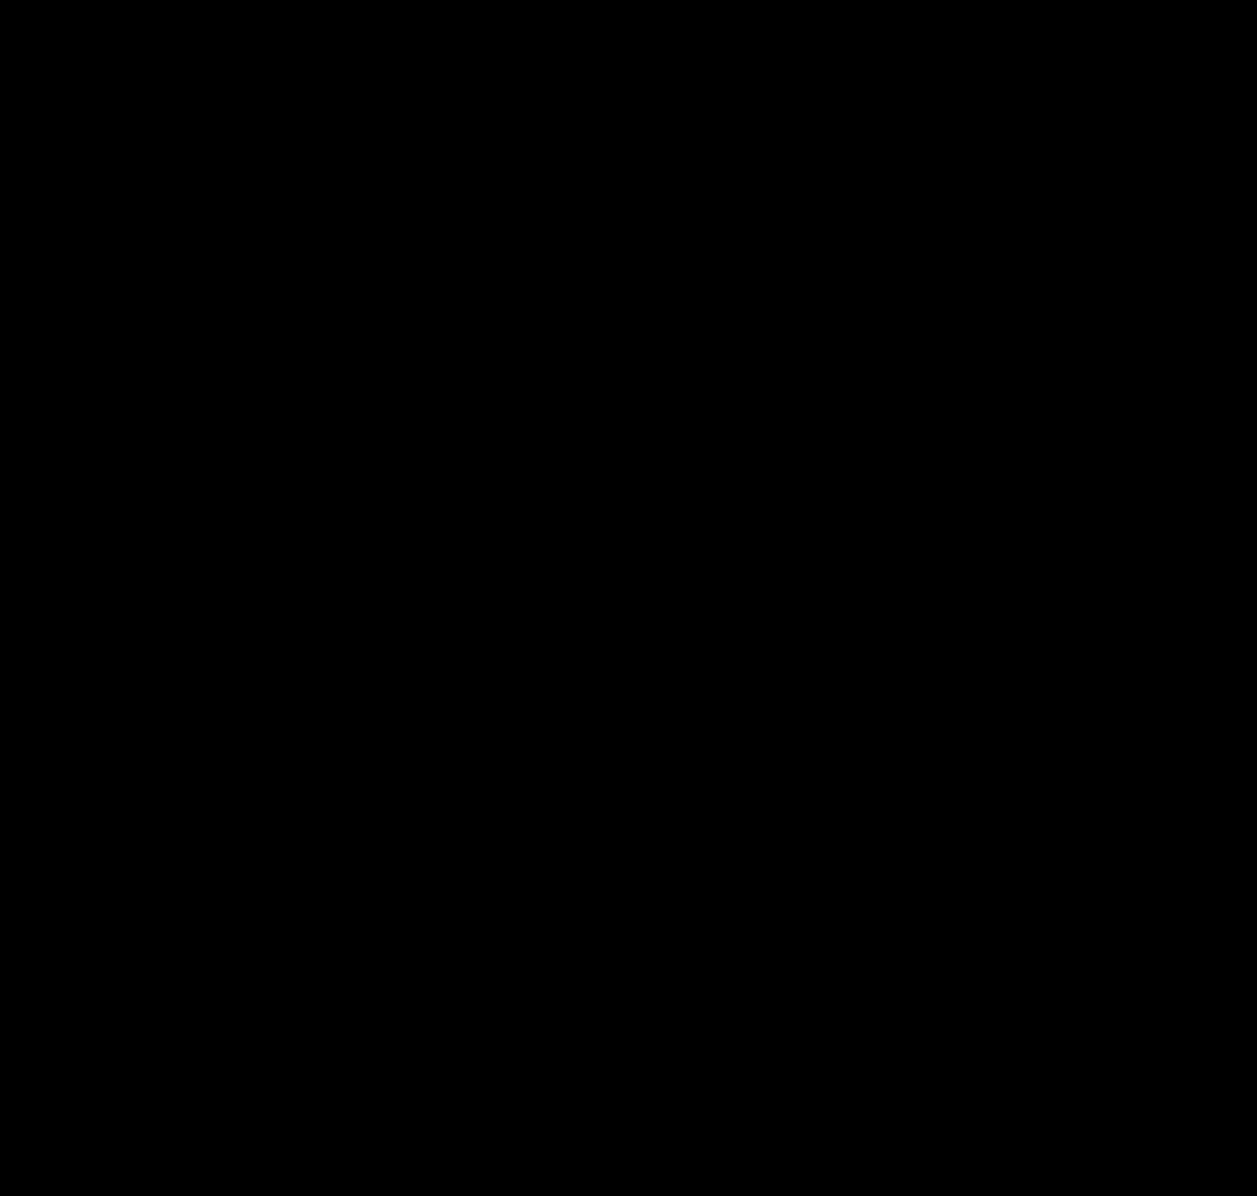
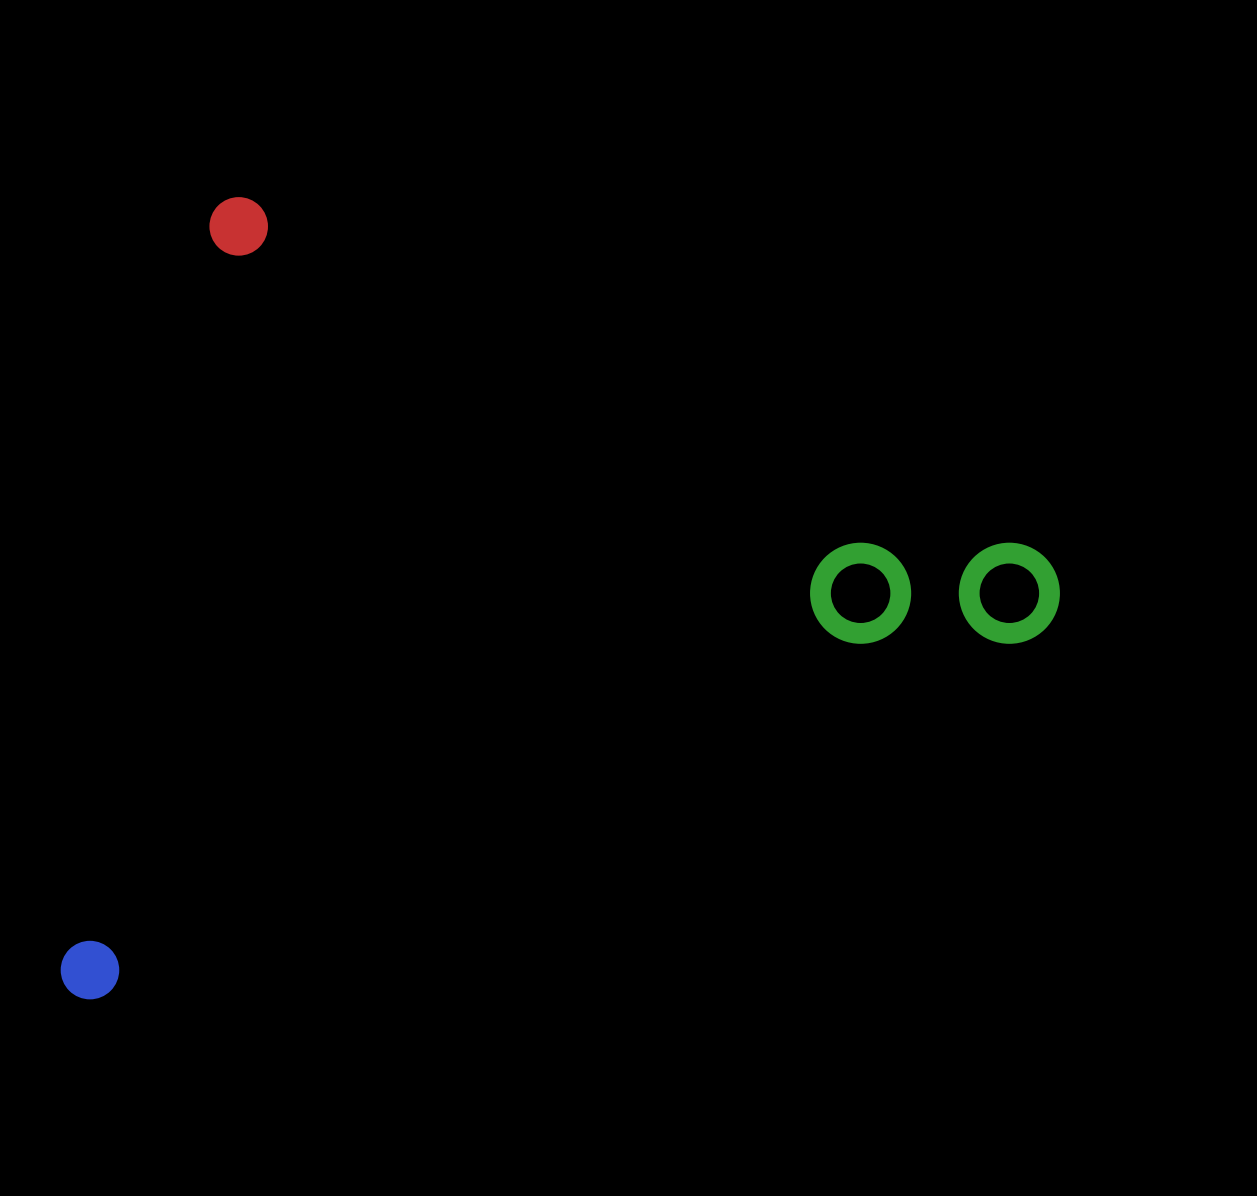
part: none -> (238, 226)
part: none -> (934, 593)
part: none -> (89, 970)

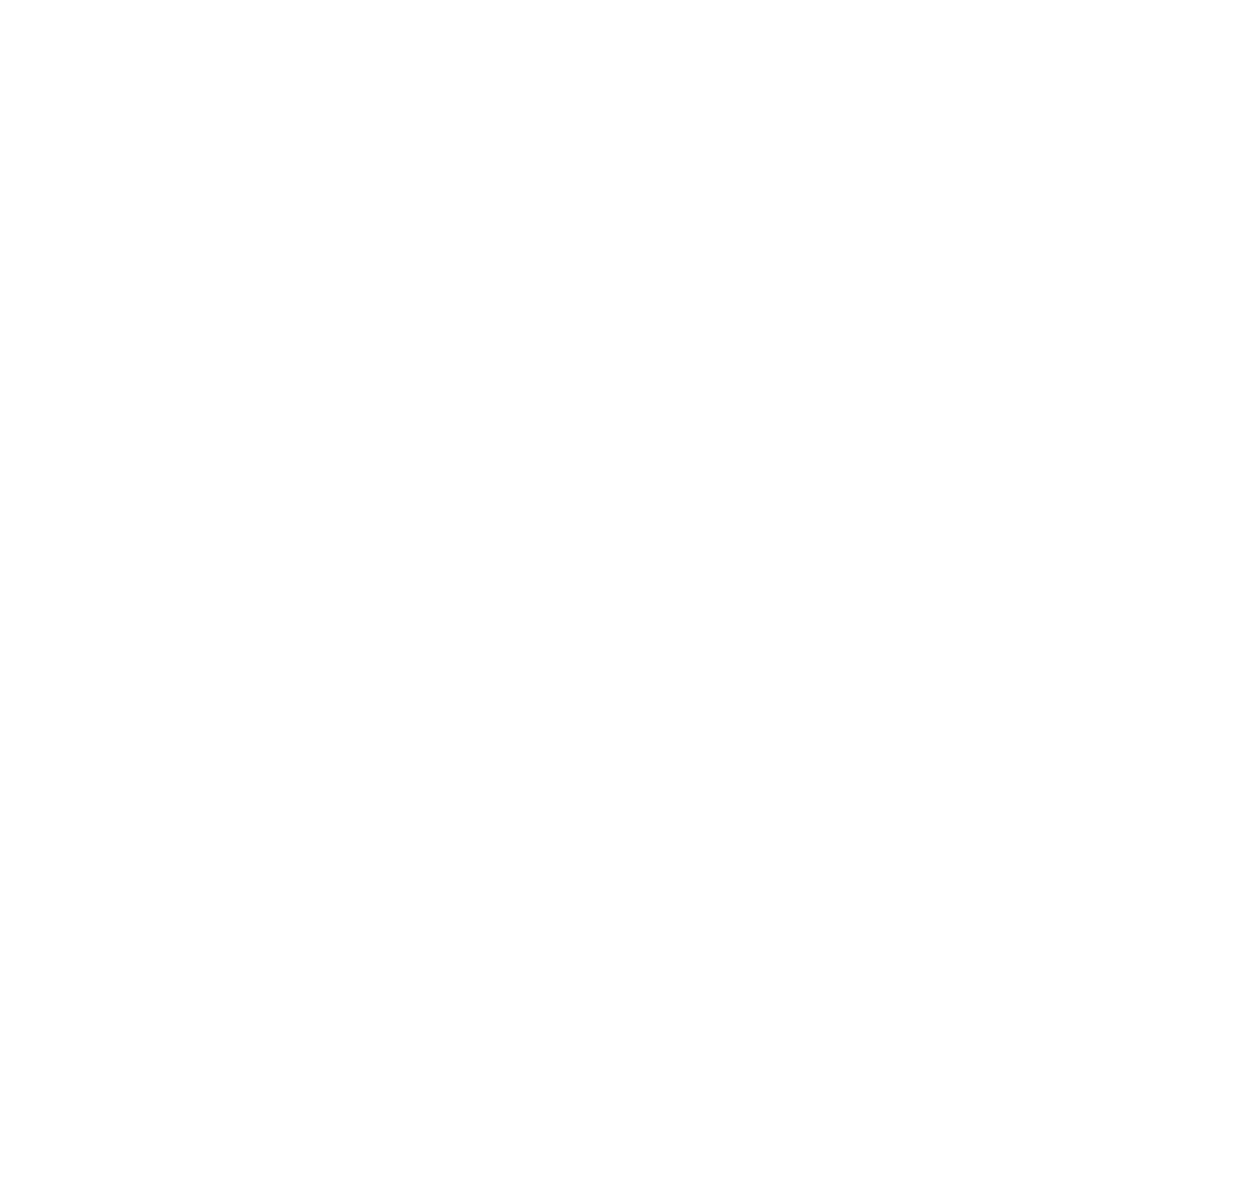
part: (238, 226) -> none
part: (934, 593) -> none
part: (89, 970) -> none

